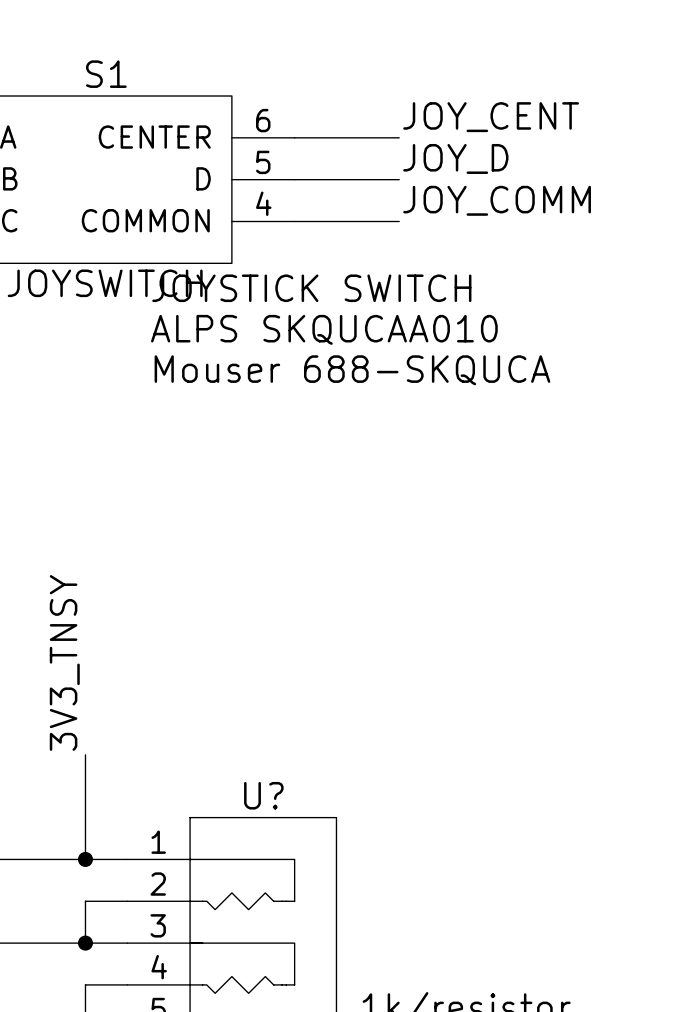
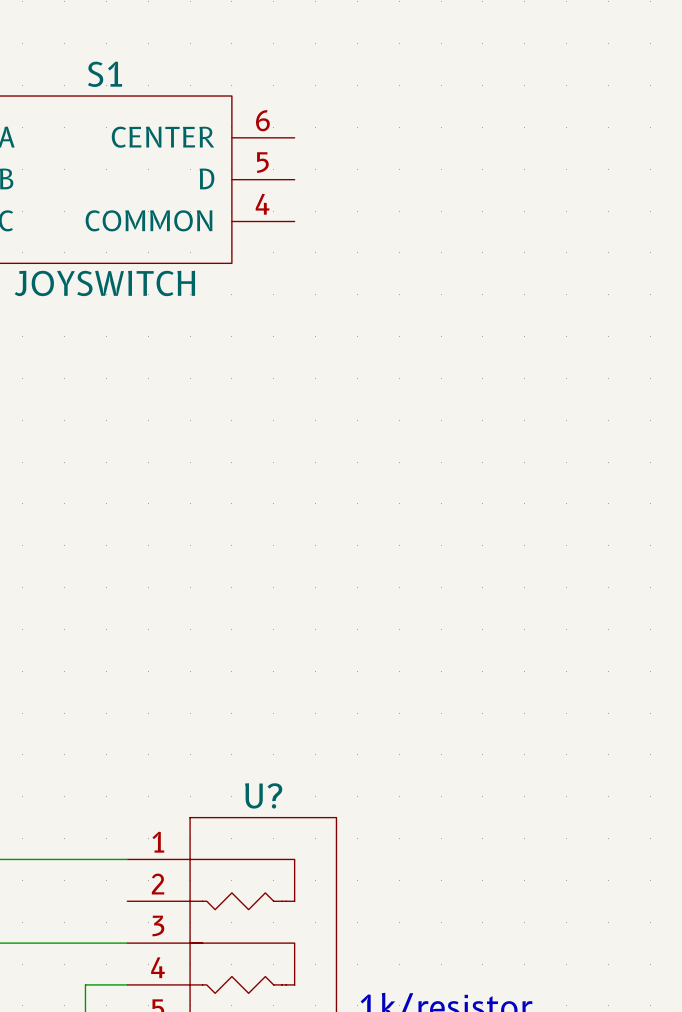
label: JOY_CENT (491, 117) -> none
wire: (294, 137) (399, 137) -> none
label: JOY_D (455, 158) -> none
wire: (294, 179) (399, 179) -> none
label: JOY_COMM (497, 200) -> none
wire: (294, 221) (399, 221) -> none
text: JOYSTICK SWITCH (311, 288) -> none
text: ALPS SKQUCAA010 (324, 329) -> none
text: Mouser 688-SKQUCA (352, 370) -> none
label: 3V3_TNSY (64, 662) -> none
wire: (85, 754) (85, 859) -> none
junction: (85, 859) -> none
wire: (127, 901) (85, 901) (85, 943) -> none
junction: (85, 943) -> none

